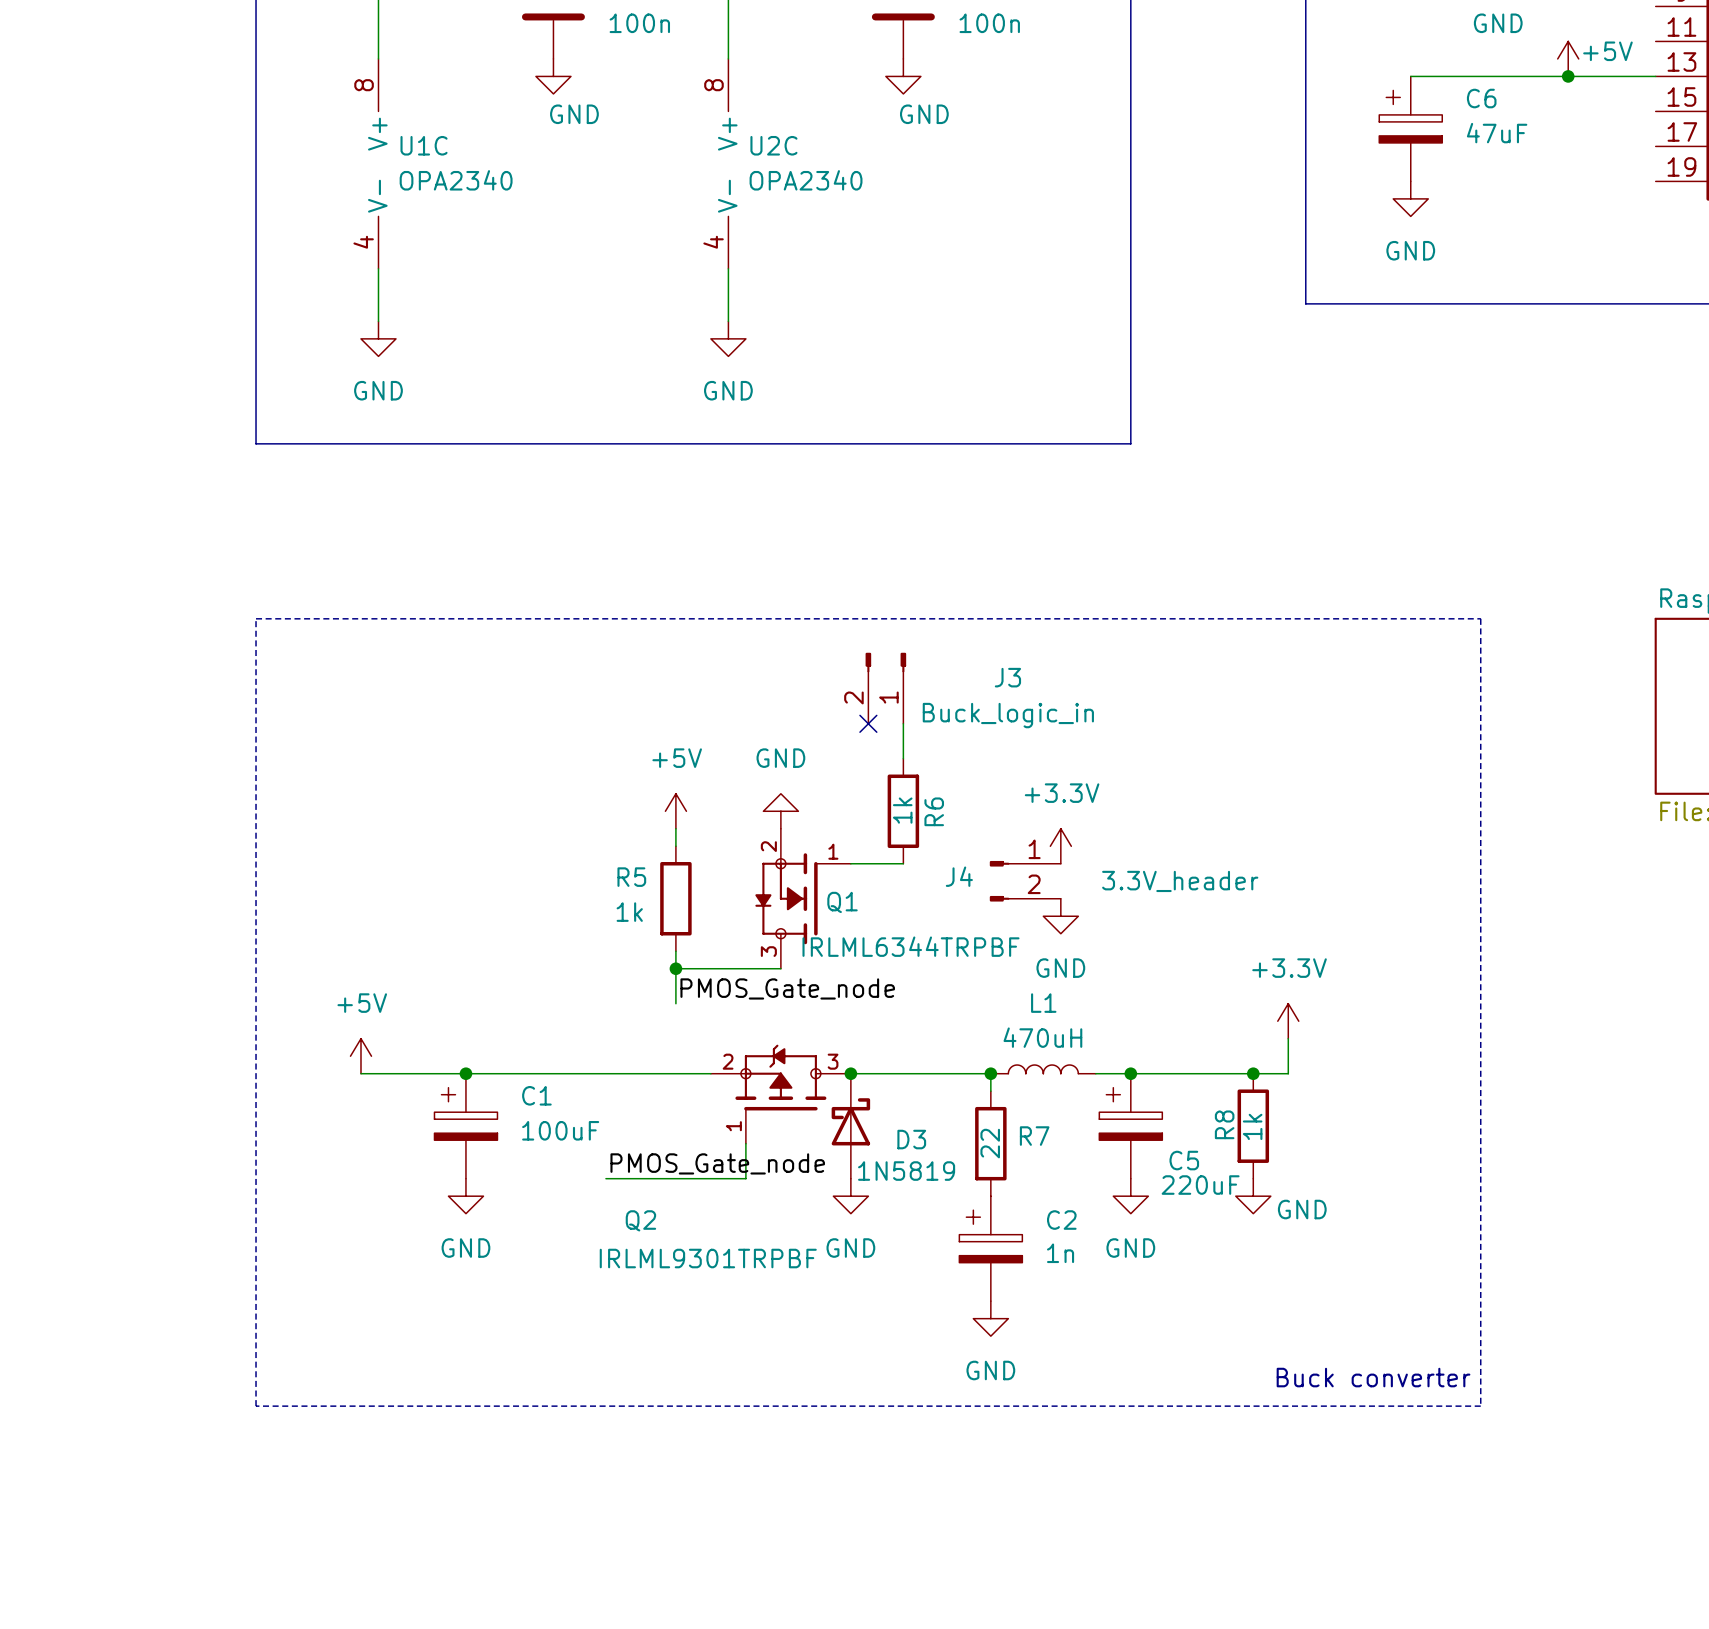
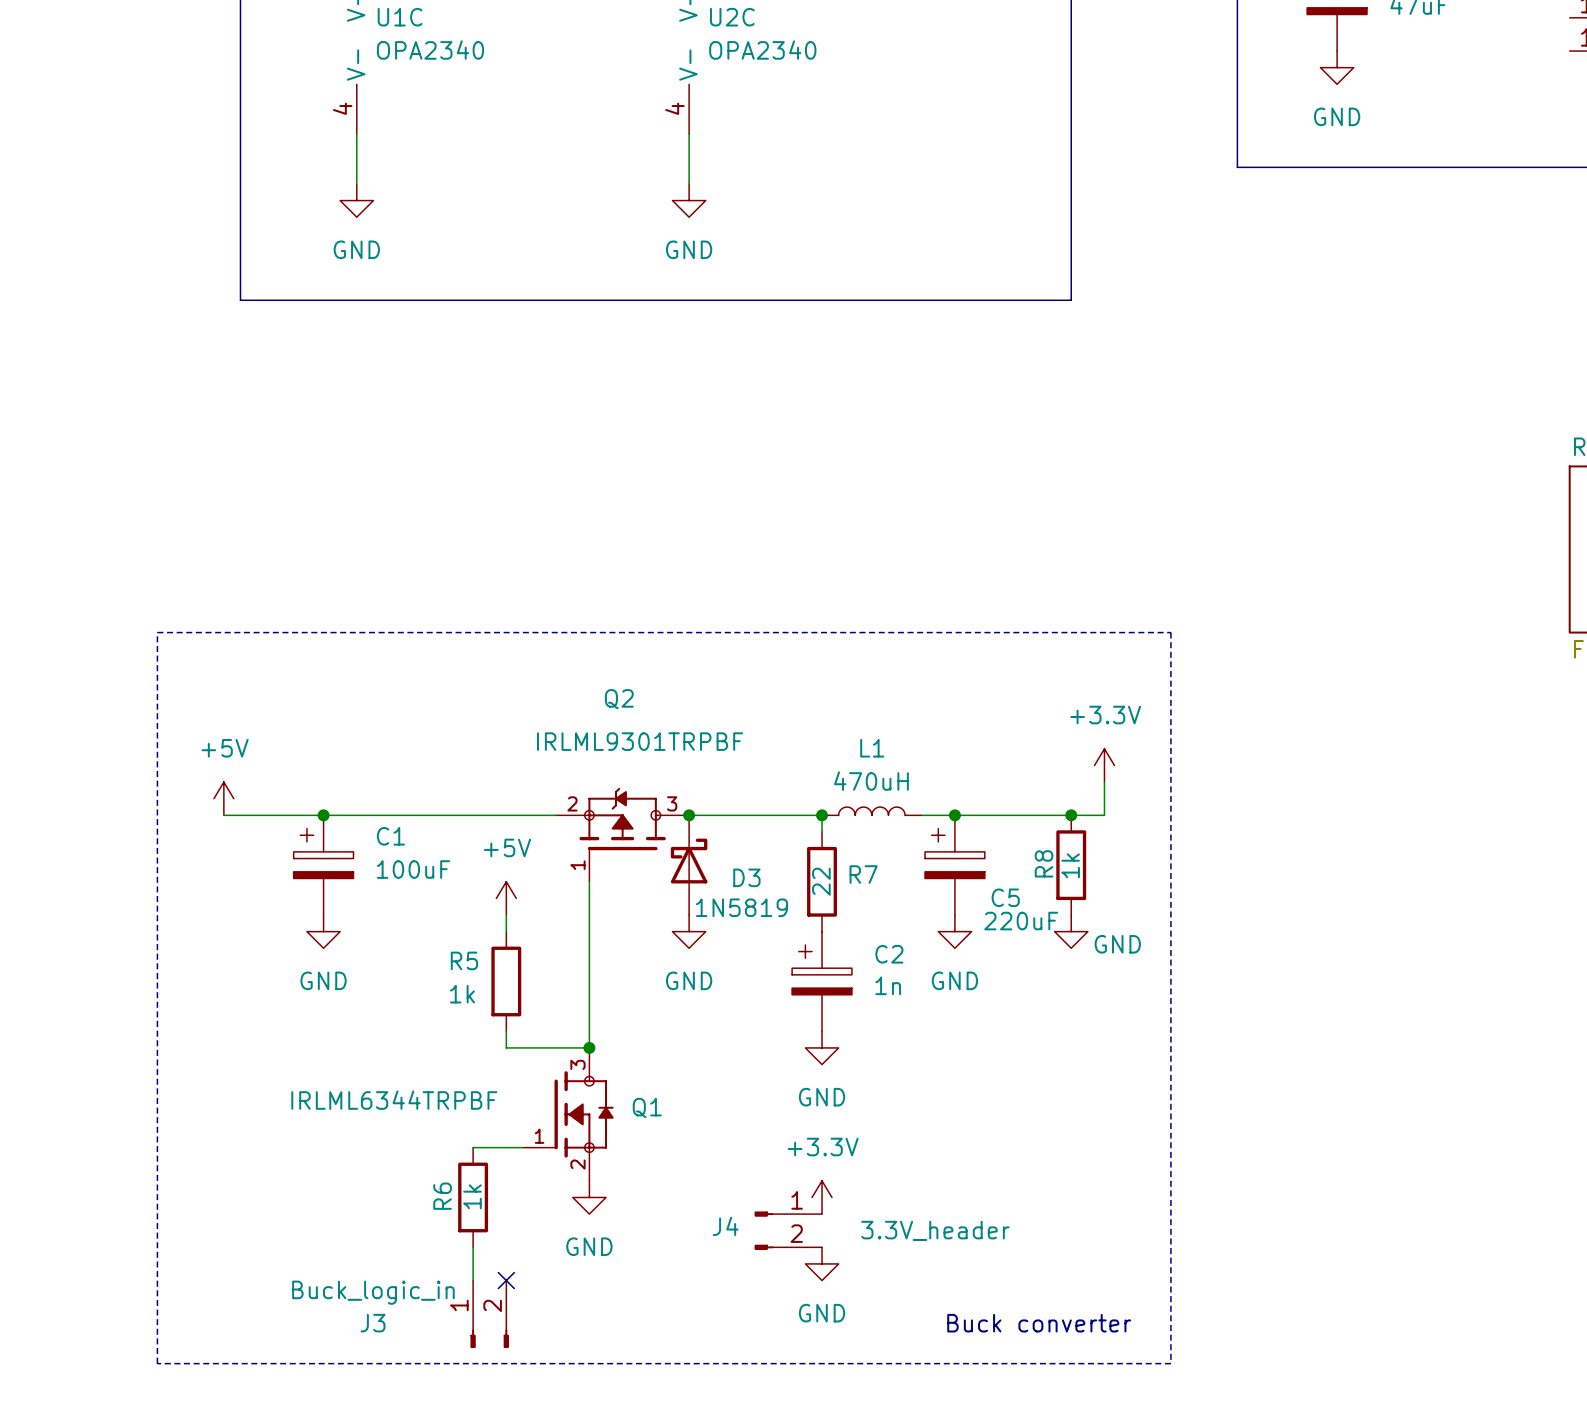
line: (256, 618) (1480, 618) (1480, 1406) (256, 1406) (256, 618) -> (157, 632) (157, 1363) (1170, 1363) (1170, 632) (157, 632)
J3 rotation: 0° (885, 662) -> 180° (489, 1338)
J3 position: (885, 688) -> (489, 1314)
no-connect mark: (868, 723) -> none
wire: (903, 723) (903, 758) -> none
power symbol: +5V (675, 811) -> none
power symbol: GND (780, 811) -> none
R6 position: (903, 811) -> (473, 1197)
R6 name position: R6 (934, 811) -> R6 (442, 1196)
wire: (675, 828) (675, 846) -> (506, 915) (506, 931)
power symbol: +3.3V (1060, 846) -> none
wire: (850, 863) (903, 863) -> none
J4 position: (1025, 881) -> (788, 1230)
R5 position: (675, 898) -> (506, 981)
Q1 rotation: 0° (786, 898) -> 180° (584, 1114)
Q1 position: (803, 898) -> (568, 1114)
Q1 name position: Q1 (842, 902) -> Q1 (647, 1107)
power symbol: GND (1060, 916) -> none
power symbol: none -> +3.3V (1104, 765)
Q1 value position: IRLML6344TRPBF (910, 946) -> IRLML6344TRPBF (394, 1100)
wire: (675, 951) (675, 1003) -> none
power symbol: none -> +5V (223, 798)
wire: (675, 968) (780, 968) -> none
junction position: (675, 968) -> (689, 815)
junction: none -> (323, 815)
junction: none -> (822, 815)
junction: none -> (954, 815)
junction: none -> (1071, 815)
label: PMOS_Gate_node (787, 988) -> none
power symbol: +3.3V (1288, 1021) -> none
wire: (1288, 1038) (1288, 1073) (1095, 1073) -> (1104, 782) (1104, 815) (921, 815)
power symbol: +5V (360, 1056) -> none
wire: none -> (589, 881) (589, 1047) (506, 1047) (506, 1031)
L1 position: (1043, 1069) -> (871, 811)
wire: (360, 1073) (710, 1073) -> (223, 815) (556, 815)
junction: (465, 1073) -> none
power symbol: none -> +5V (506, 898)
wire: (850, 1073) (990, 1073) (990, 1091) -> (689, 815) (822, 815) (822, 831)
junction: (850, 1073) -> none
junction: (990, 1073) -> none
junction: (1130, 1073) -> none
junction: (1253, 1073) -> none
Q2 position: (780, 1094) -> (622, 834)
power symbol: none -> GND (323, 931)
power symbol: none -> GND (689, 931)
power symbol: none -> GND (954, 931)
power symbol: none -> GND (1071, 931)
C1 position: (465, 1126) -> (323, 865)
D3 position: (850, 1126) -> (689, 865)
C5 position: (1130, 1126) -> (954, 865)
R8 position: (1253, 1126) -> (1071, 865)
wire: (745, 1143) (745, 1178) (605, 1178) -> none
R7 position: (990, 1143) -> (822, 881)
label: PMOS_Gate_node (717, 1163) -> none
power symbol: GND (465, 1196) -> none
power symbol position: GND (850, 1196) -> GND (822, 1047)
power symbol: GND (1130, 1196) -> none
power symbol: GND (1253, 1196) -> none
Q2 name position: Q2 (640, 1220) -> Q2 (619, 699)
junction: none -> (589, 1047)
C2 position: (990, 1248) -> (822, 981)
Q2 value position: IRLML9301TRPBF (708, 1258) -> IRLML9301TRPBF (640, 741)
power symbol: GND (990, 1318) -> none
wire: none -> (473, 1147) (522, 1147)
text position: Buck converter (1373, 1377) -> Buck converter (1039, 1323)
power symbol: none -> GND (589, 1197)
power symbol: none -> +3.3V (822, 1197)
wire: none -> (473, 1247) (473, 1280)
power symbol: none -> GND (822, 1263)
no-connect mark: none -> (506, 1280)

